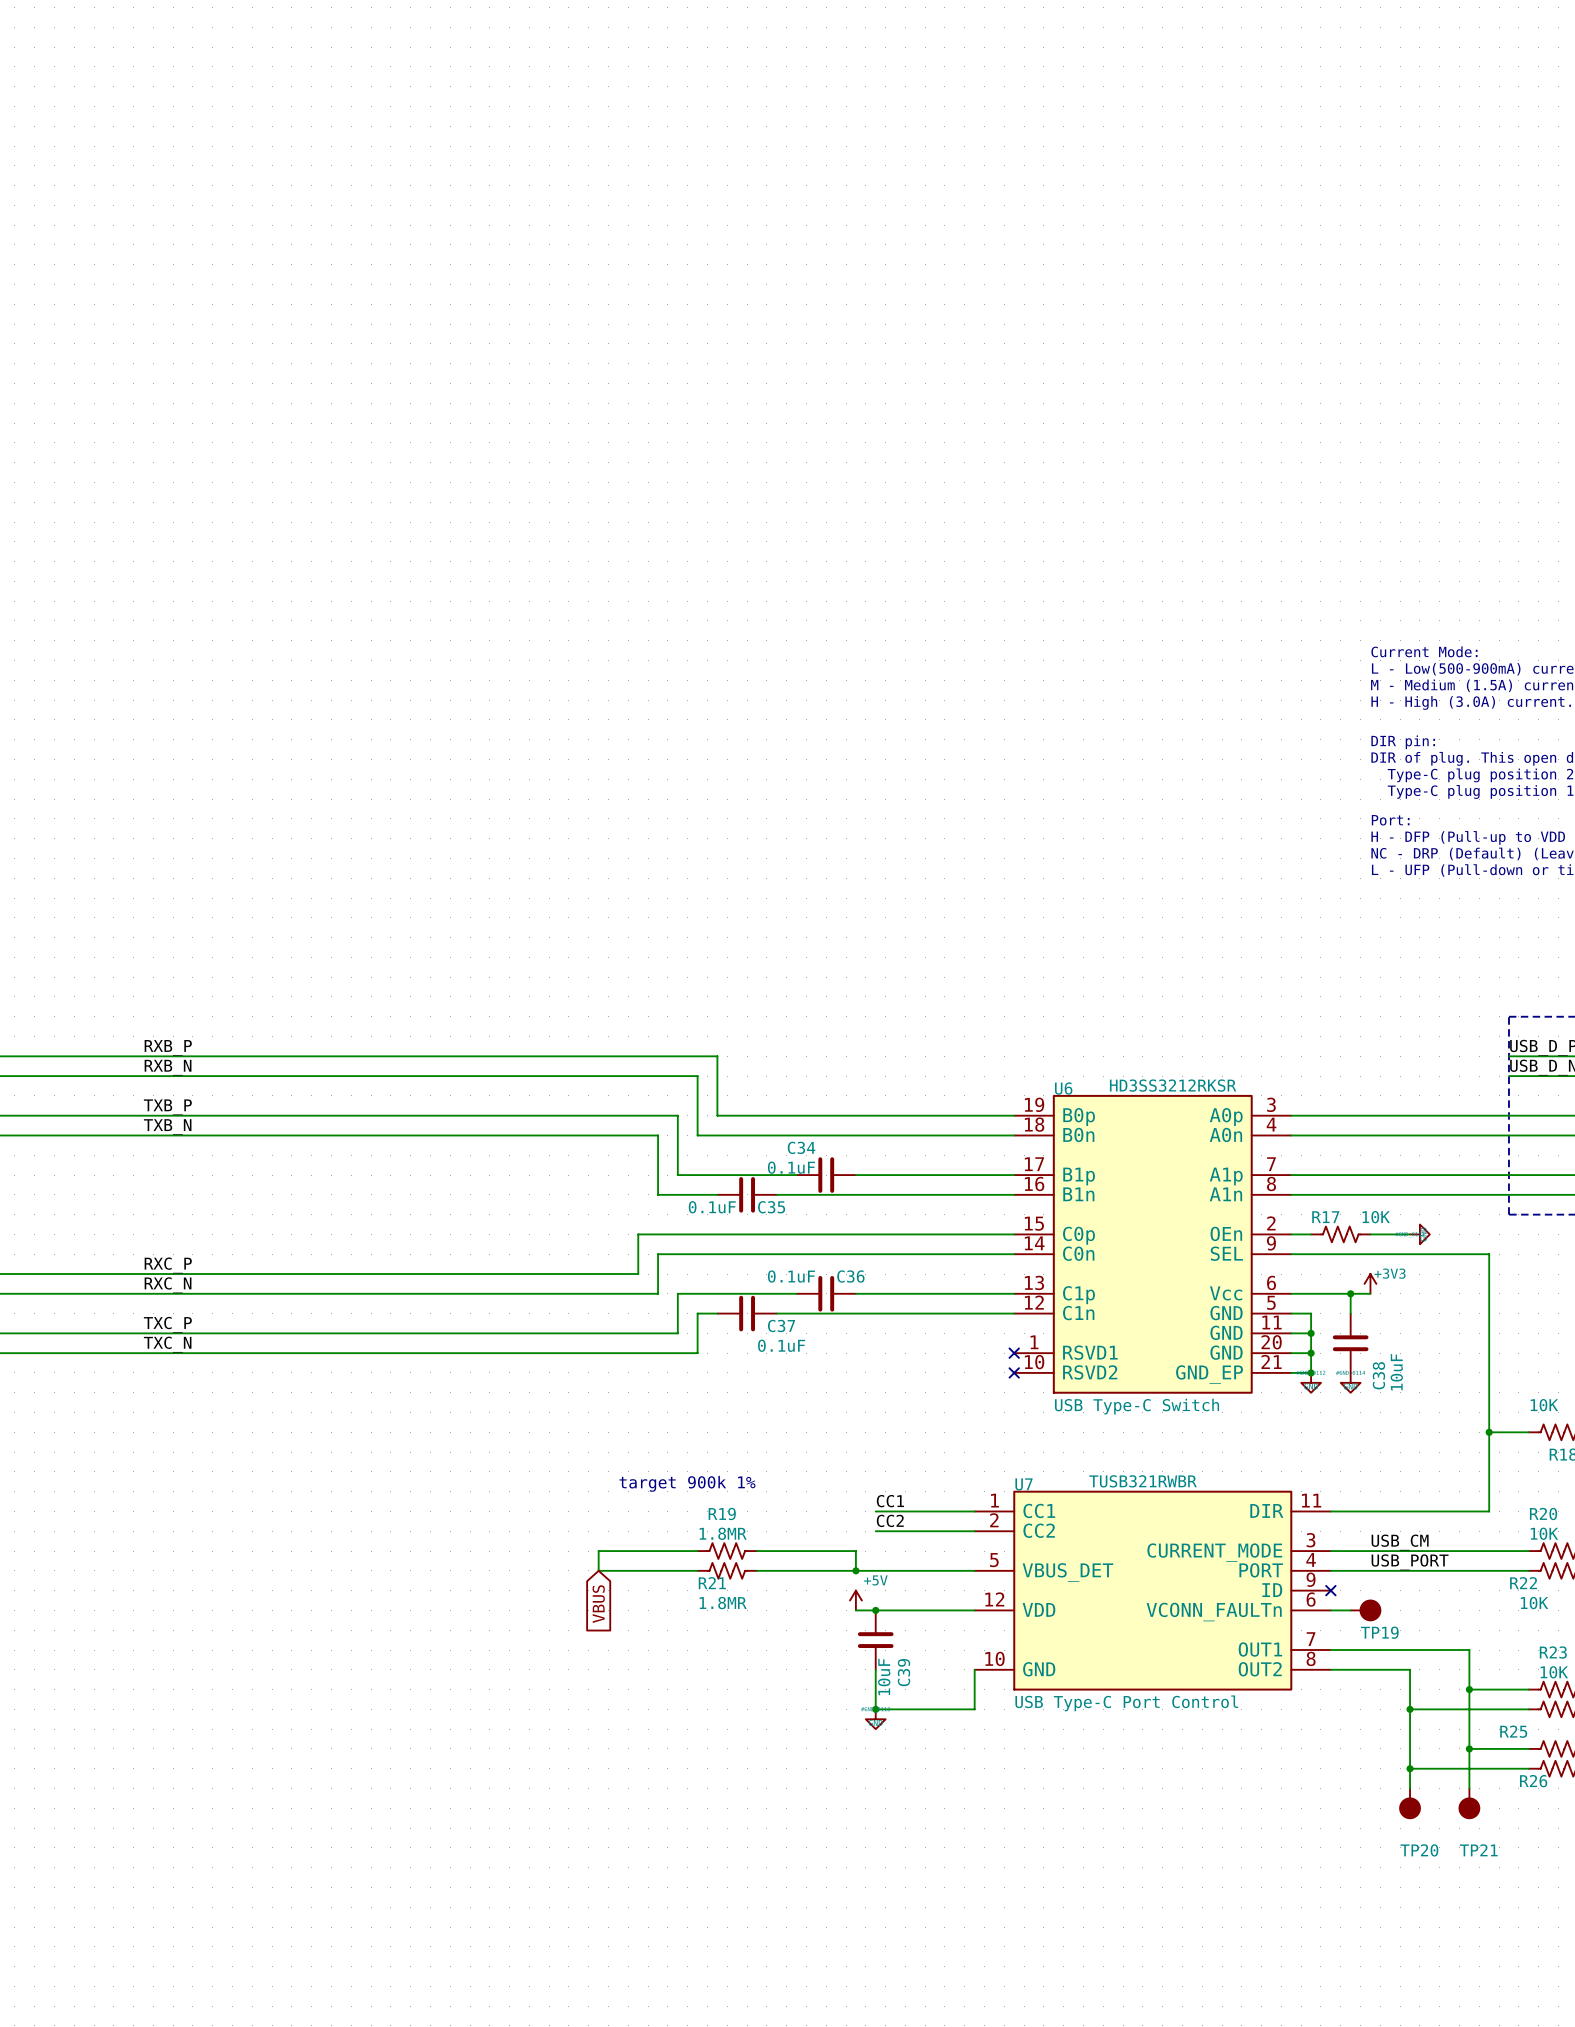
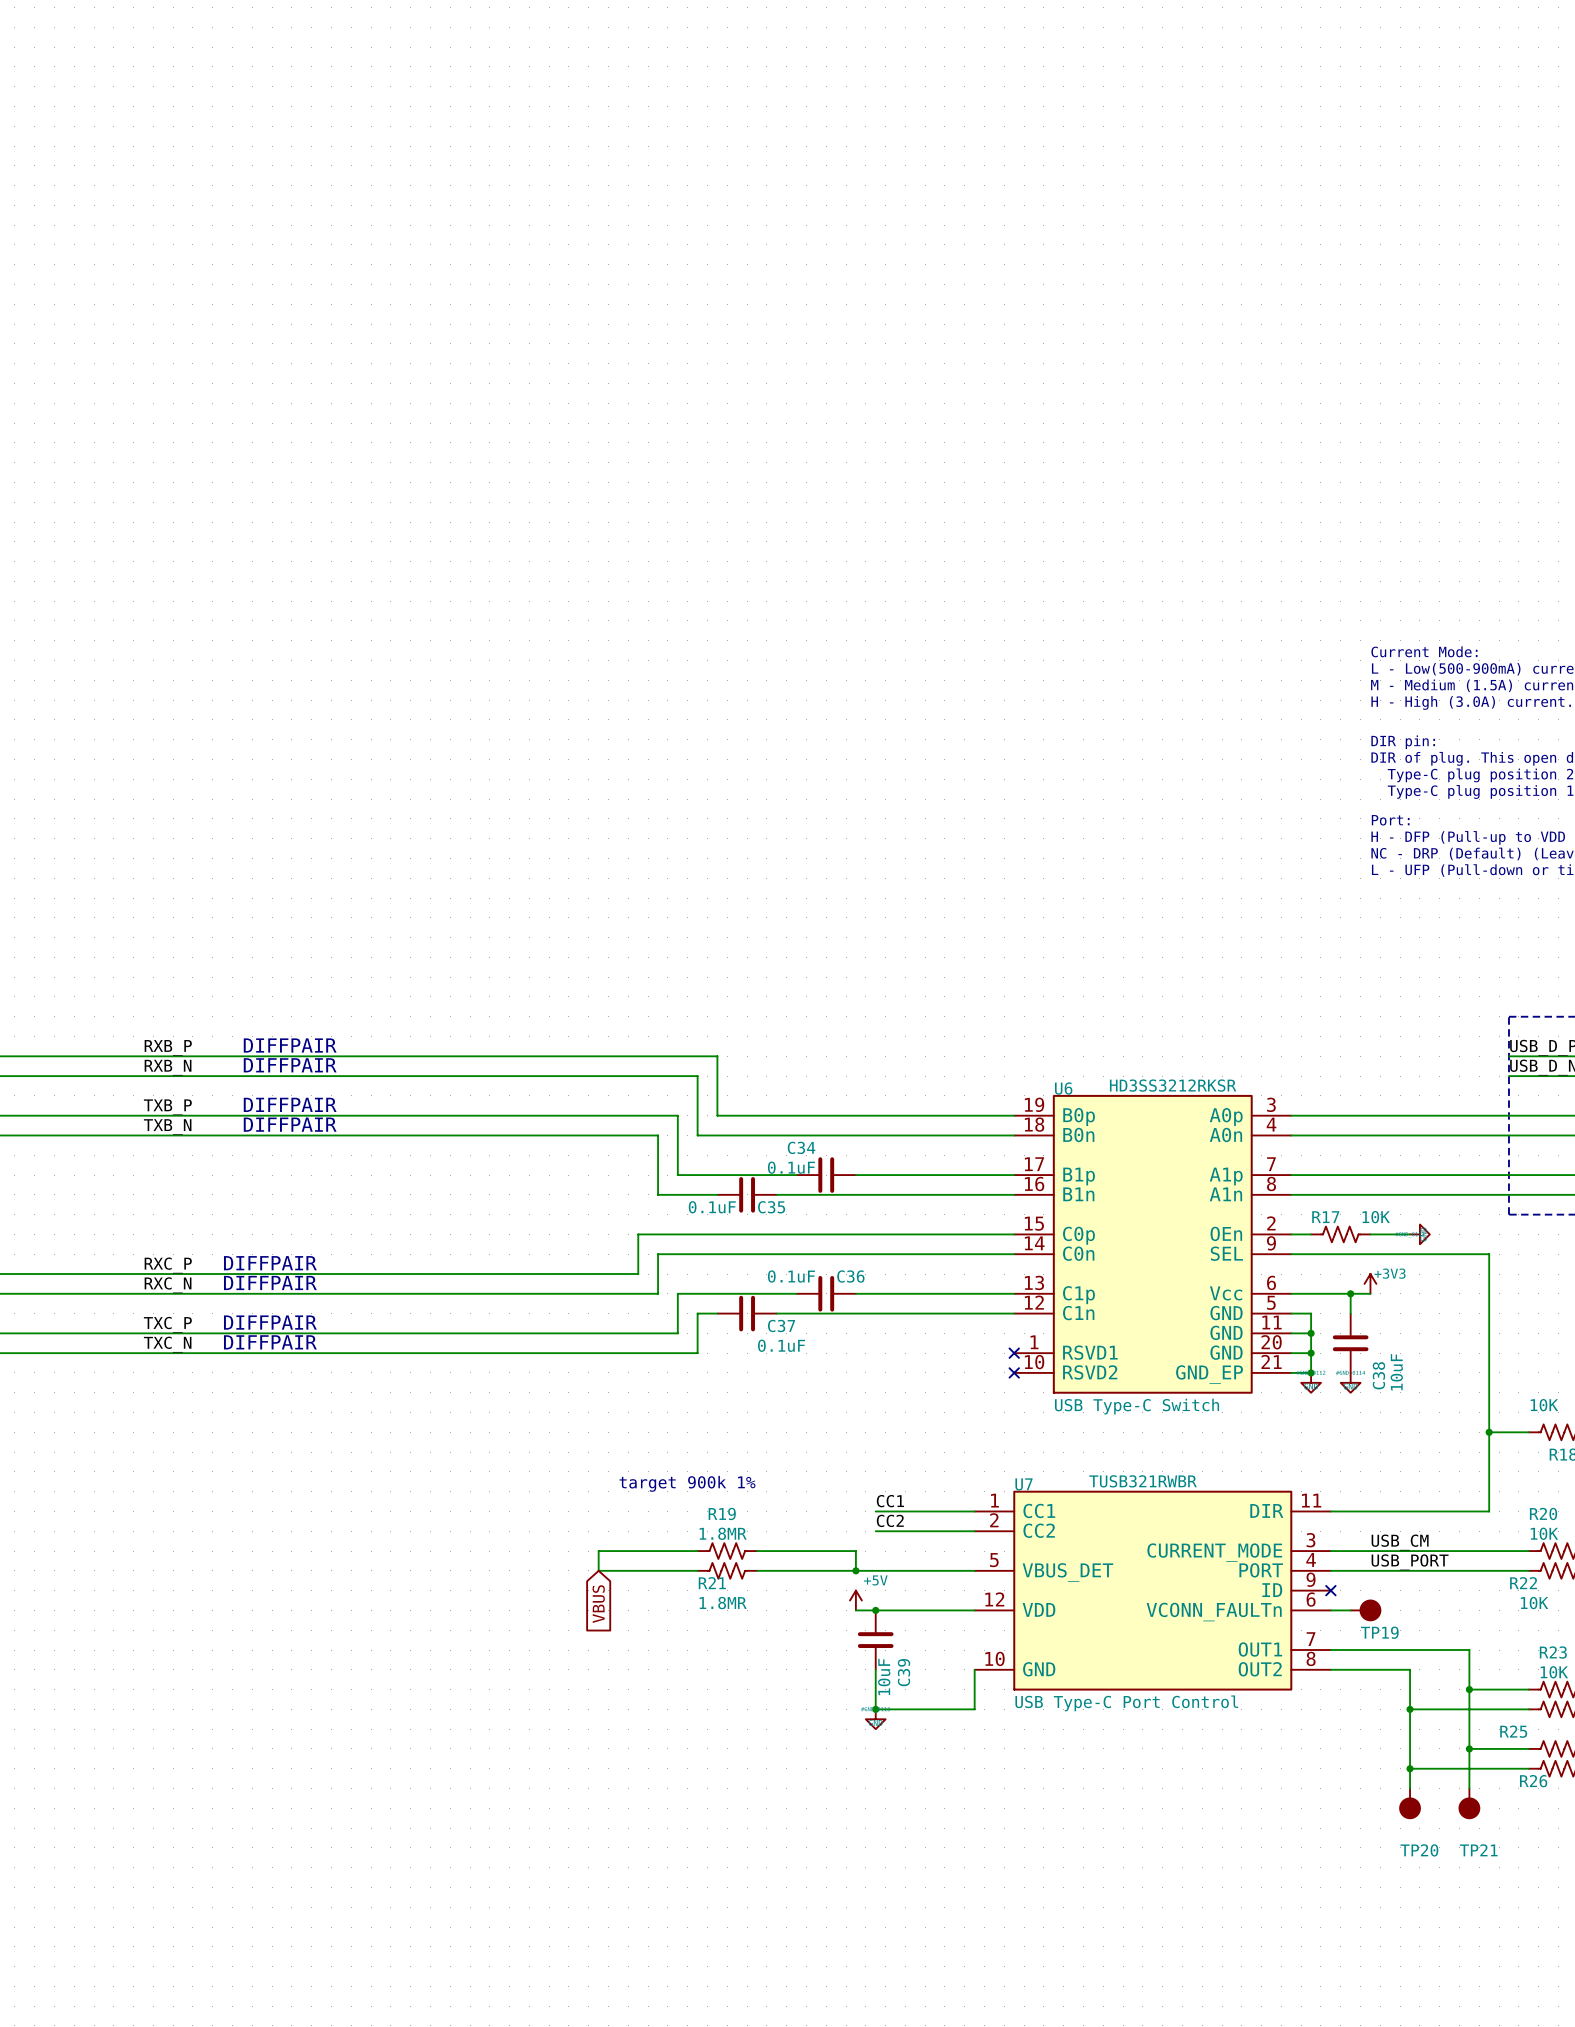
text: none -> DIFFPAIR (290, 1045)
text: none -> DIFFPAIR (290, 1065)
text: none -> DIFFPAIR (290, 1104)
text: none -> DIFFPAIR (290, 1124)
text: none -> DIFFPAIR (270, 1263)
text: none -> DIFFPAIR (270, 1282)
text: none -> DIFFPAIR (270, 1322)
text: none -> DIFFPAIR (270, 1342)

